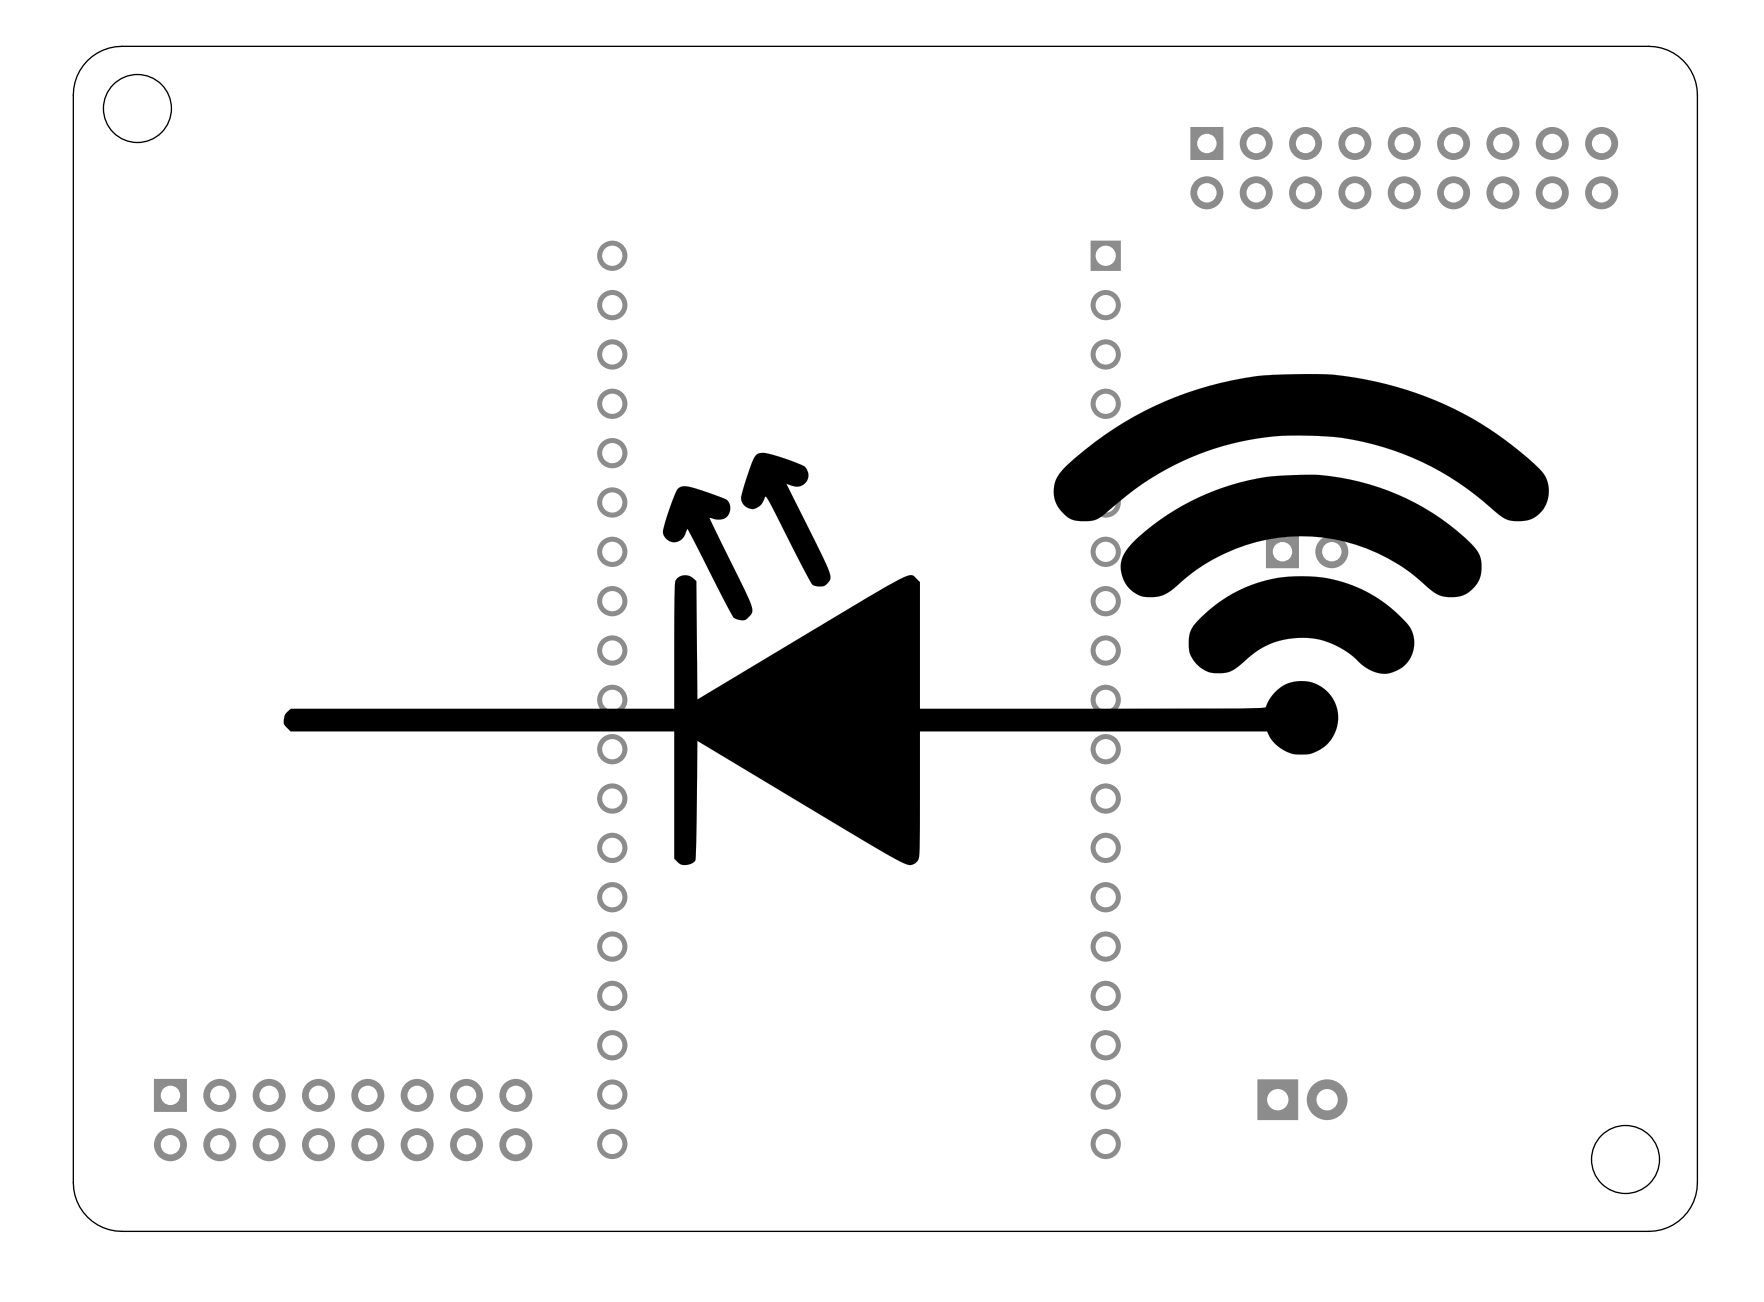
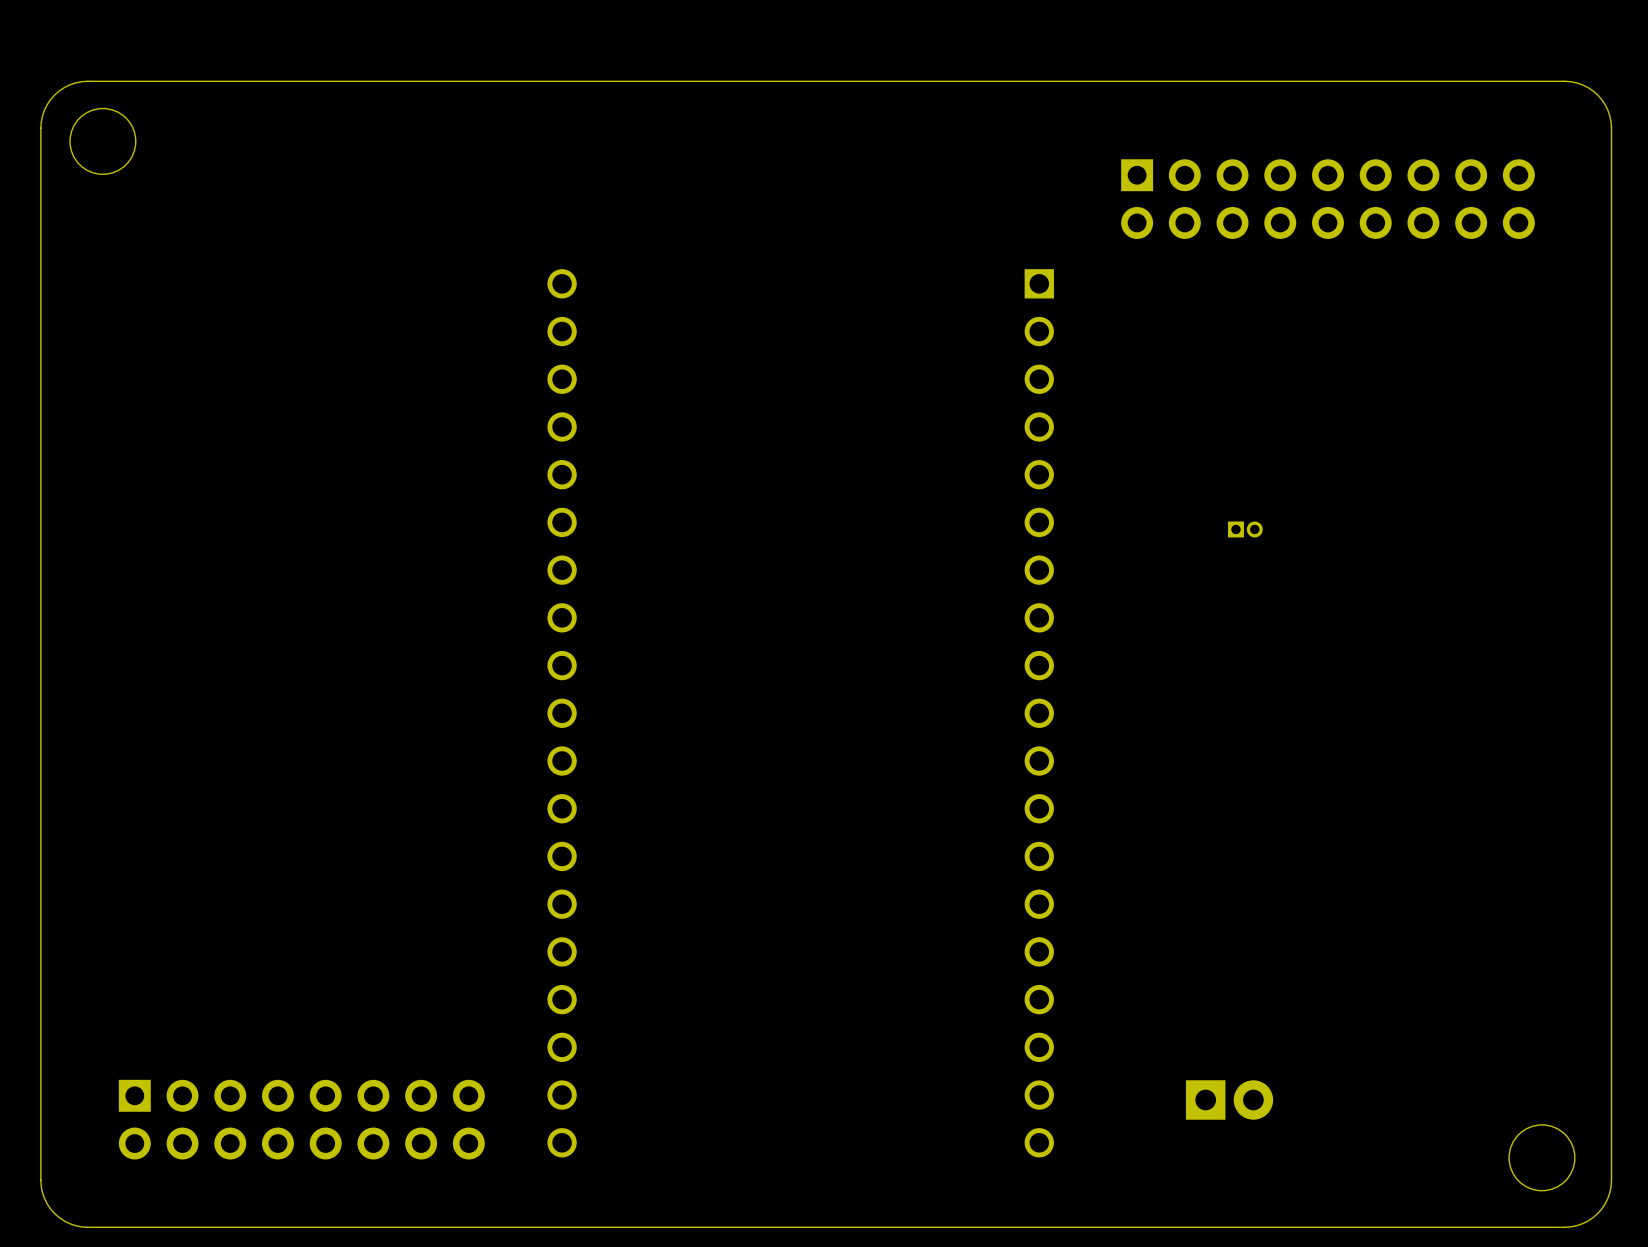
drawing: [283, 374, 1549, 866] -> none
part: none -> (1245, 529)
part: (1307, 551) -> none

